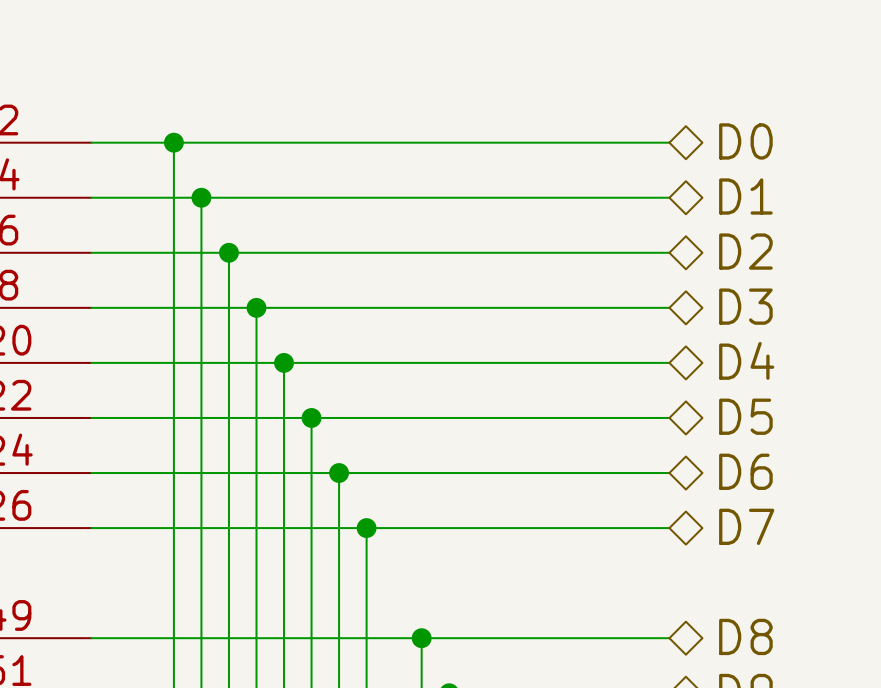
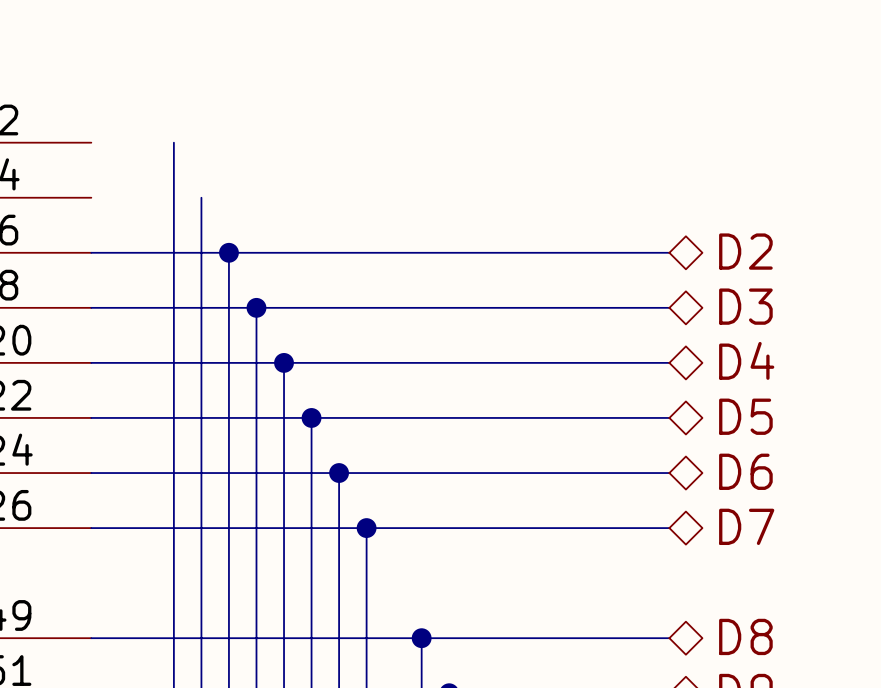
hierarchical label: D0 (745, 141) -> none
wire: (91, 142) (669, 142) -> none
junction: (173, 142) -> none
hierarchical label: D1 (745, 196) -> none
wire: (91, 197) (669, 197) -> none
junction: (201, 197) -> none

